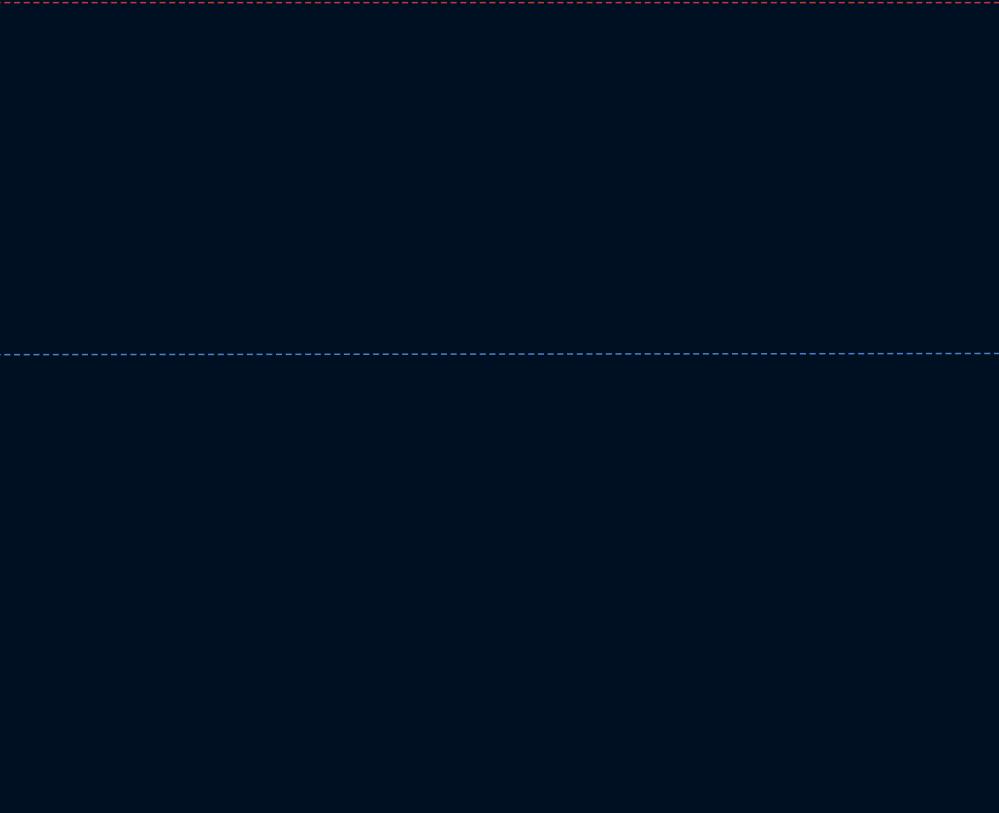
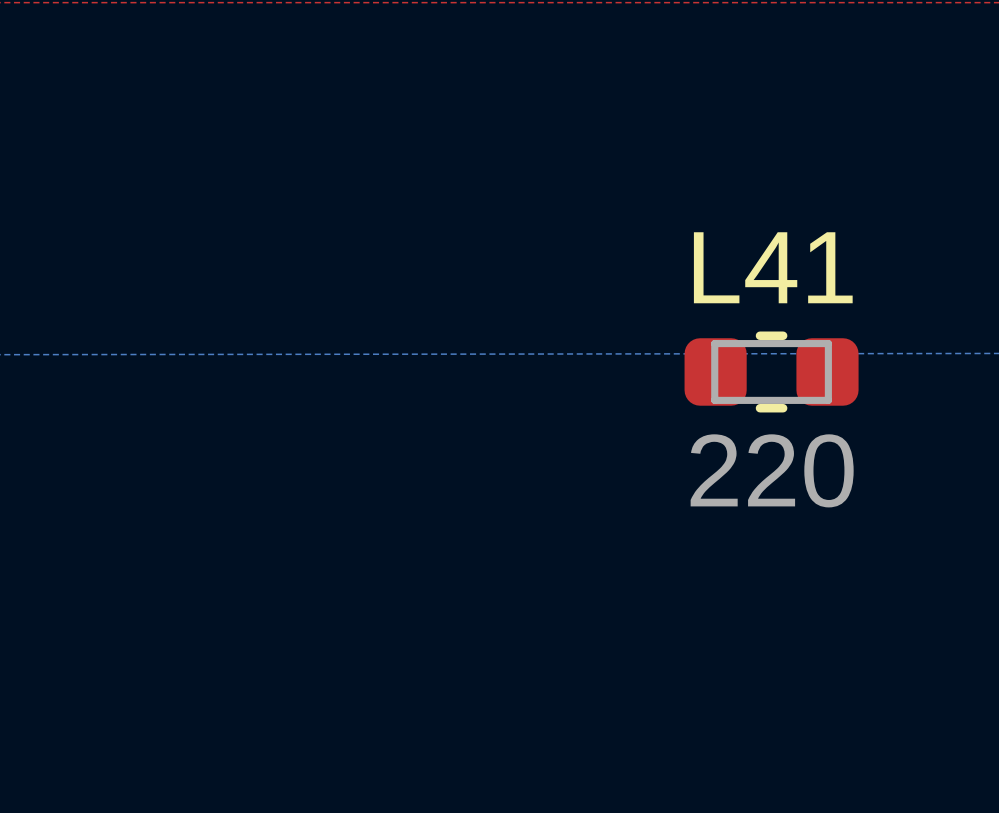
L41: none -> 220 (771, 371)

